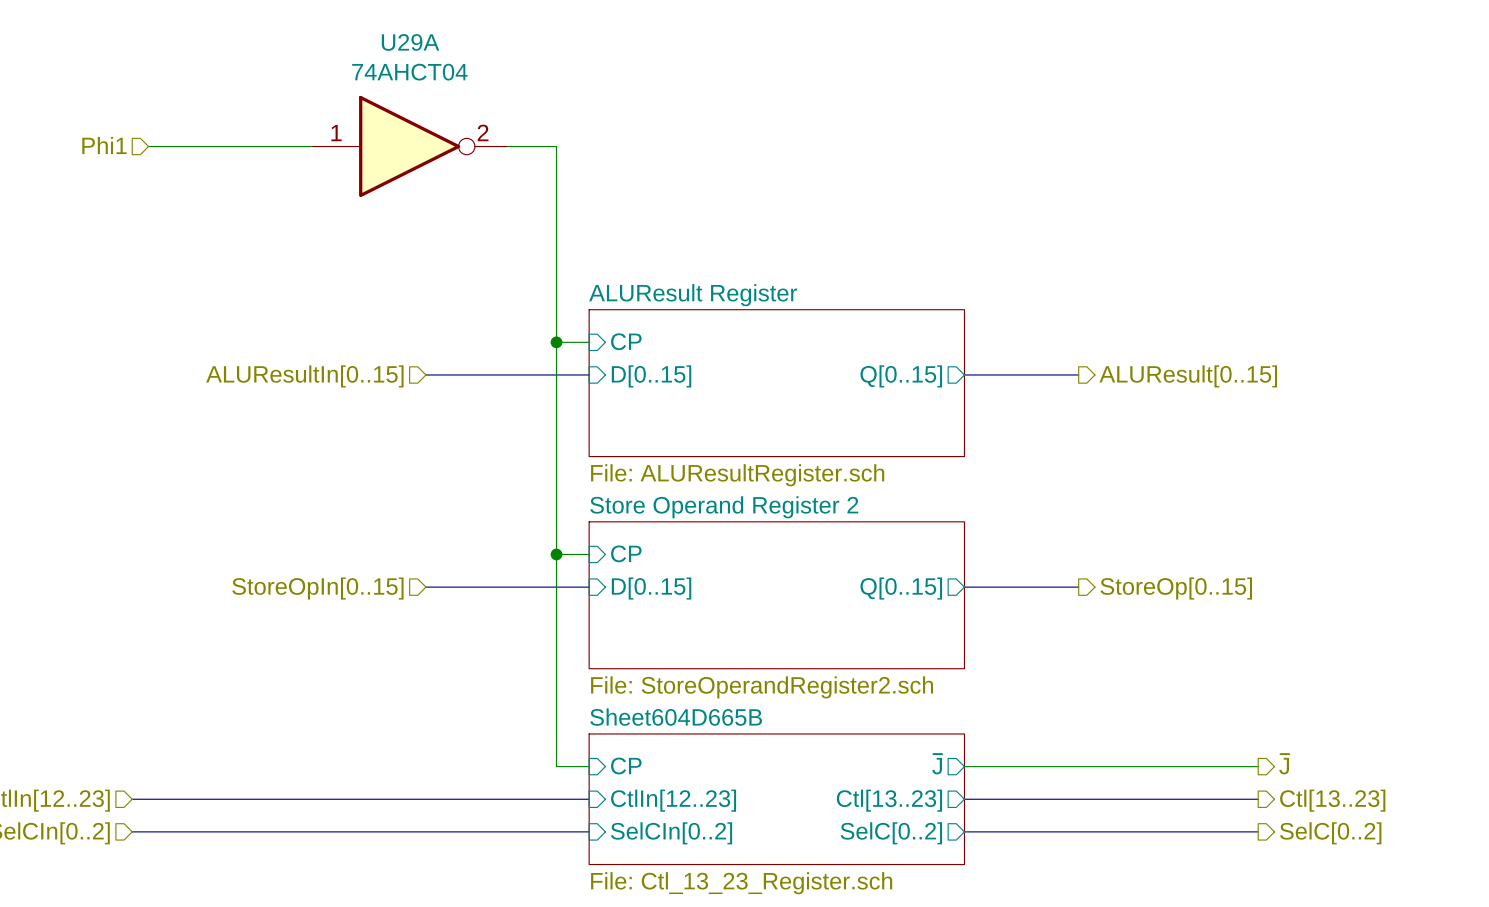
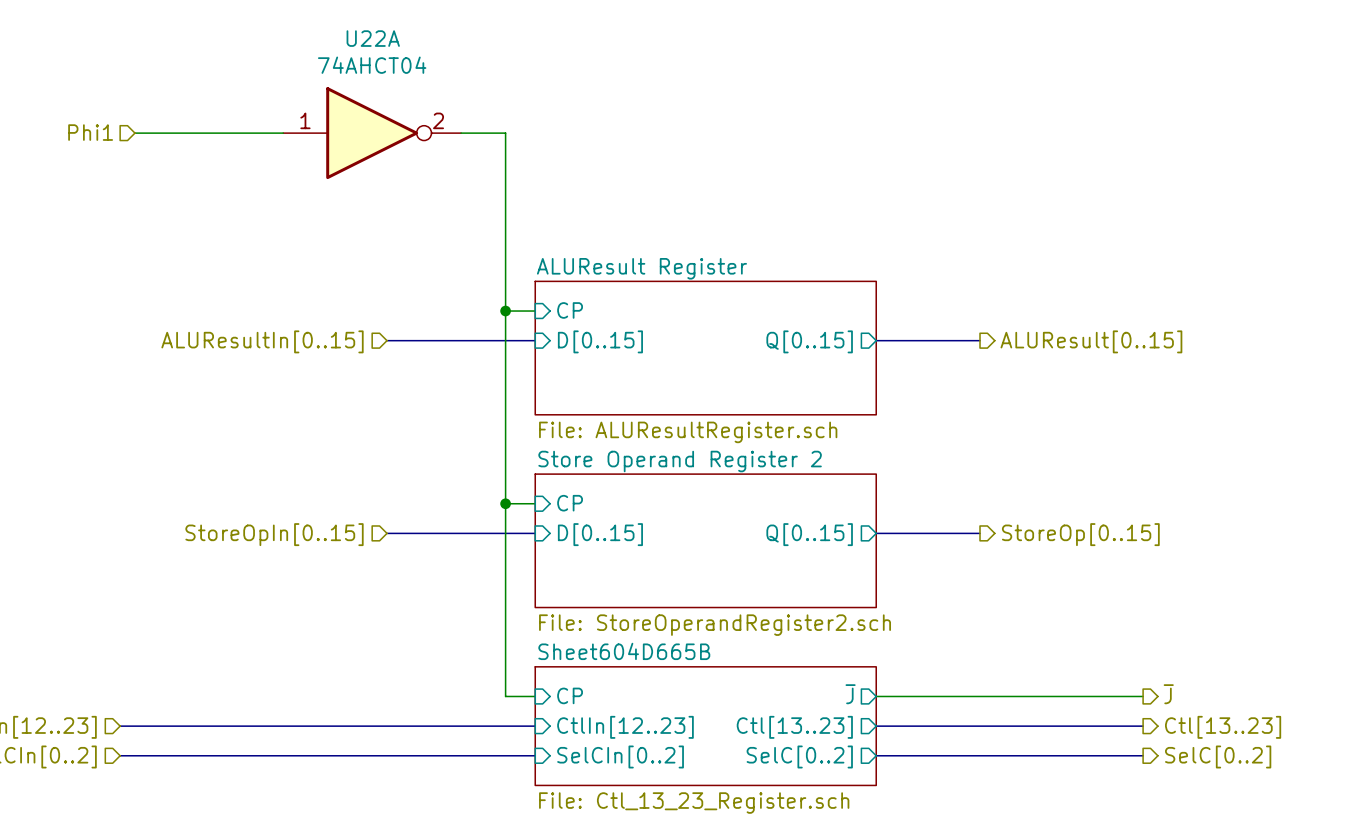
U29A name: U29A (410, 42) -> U22A (373, 38)

